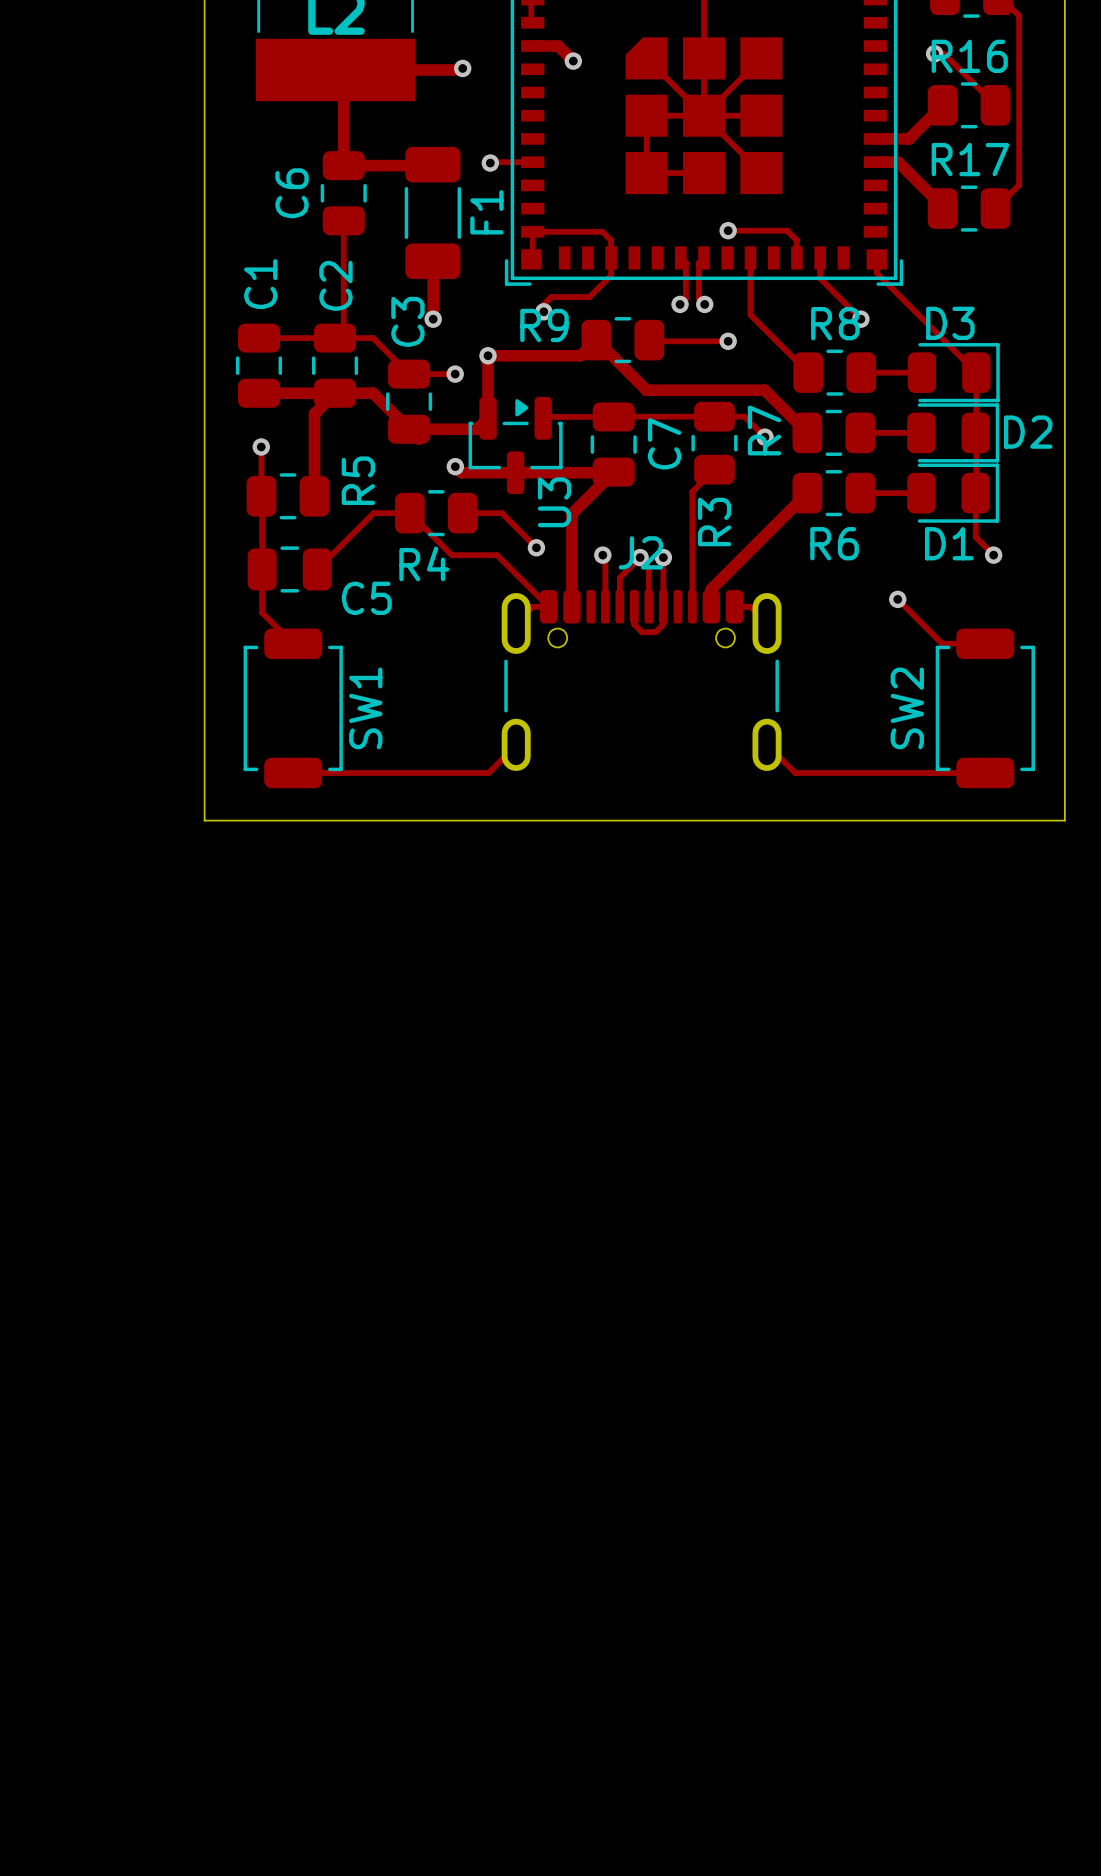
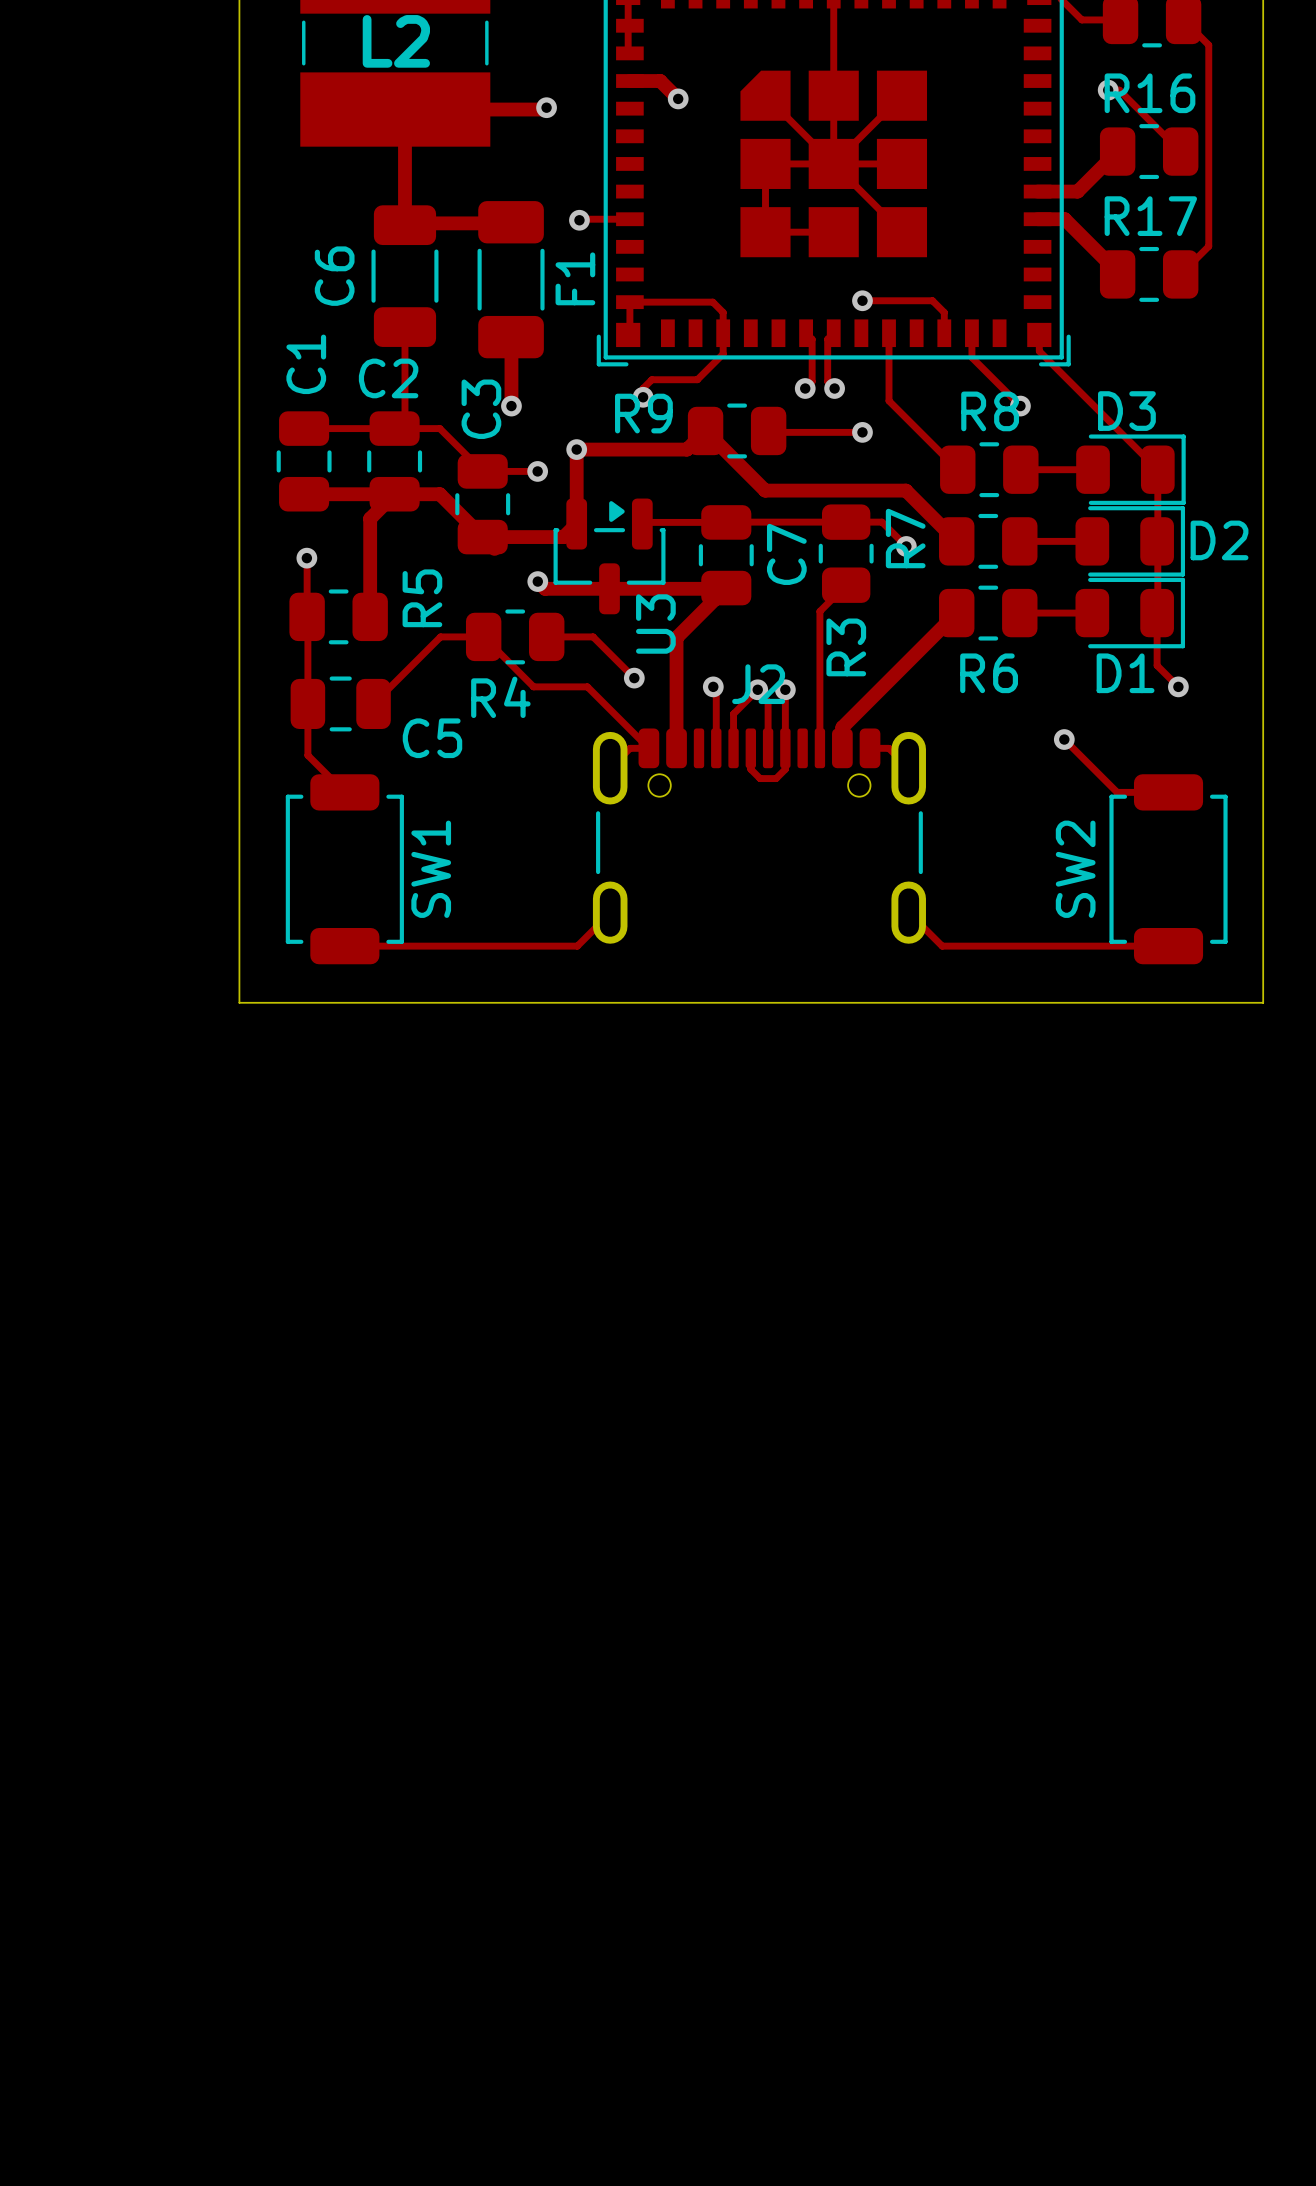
C6 footprint: [320, 151, 367, 236] -> [371, 205, 439, 347]
track: (343, 220) (343, 252) -> none
C2 name rotation: 0° (335, 285) -> 90° clockwise (388, 378)

